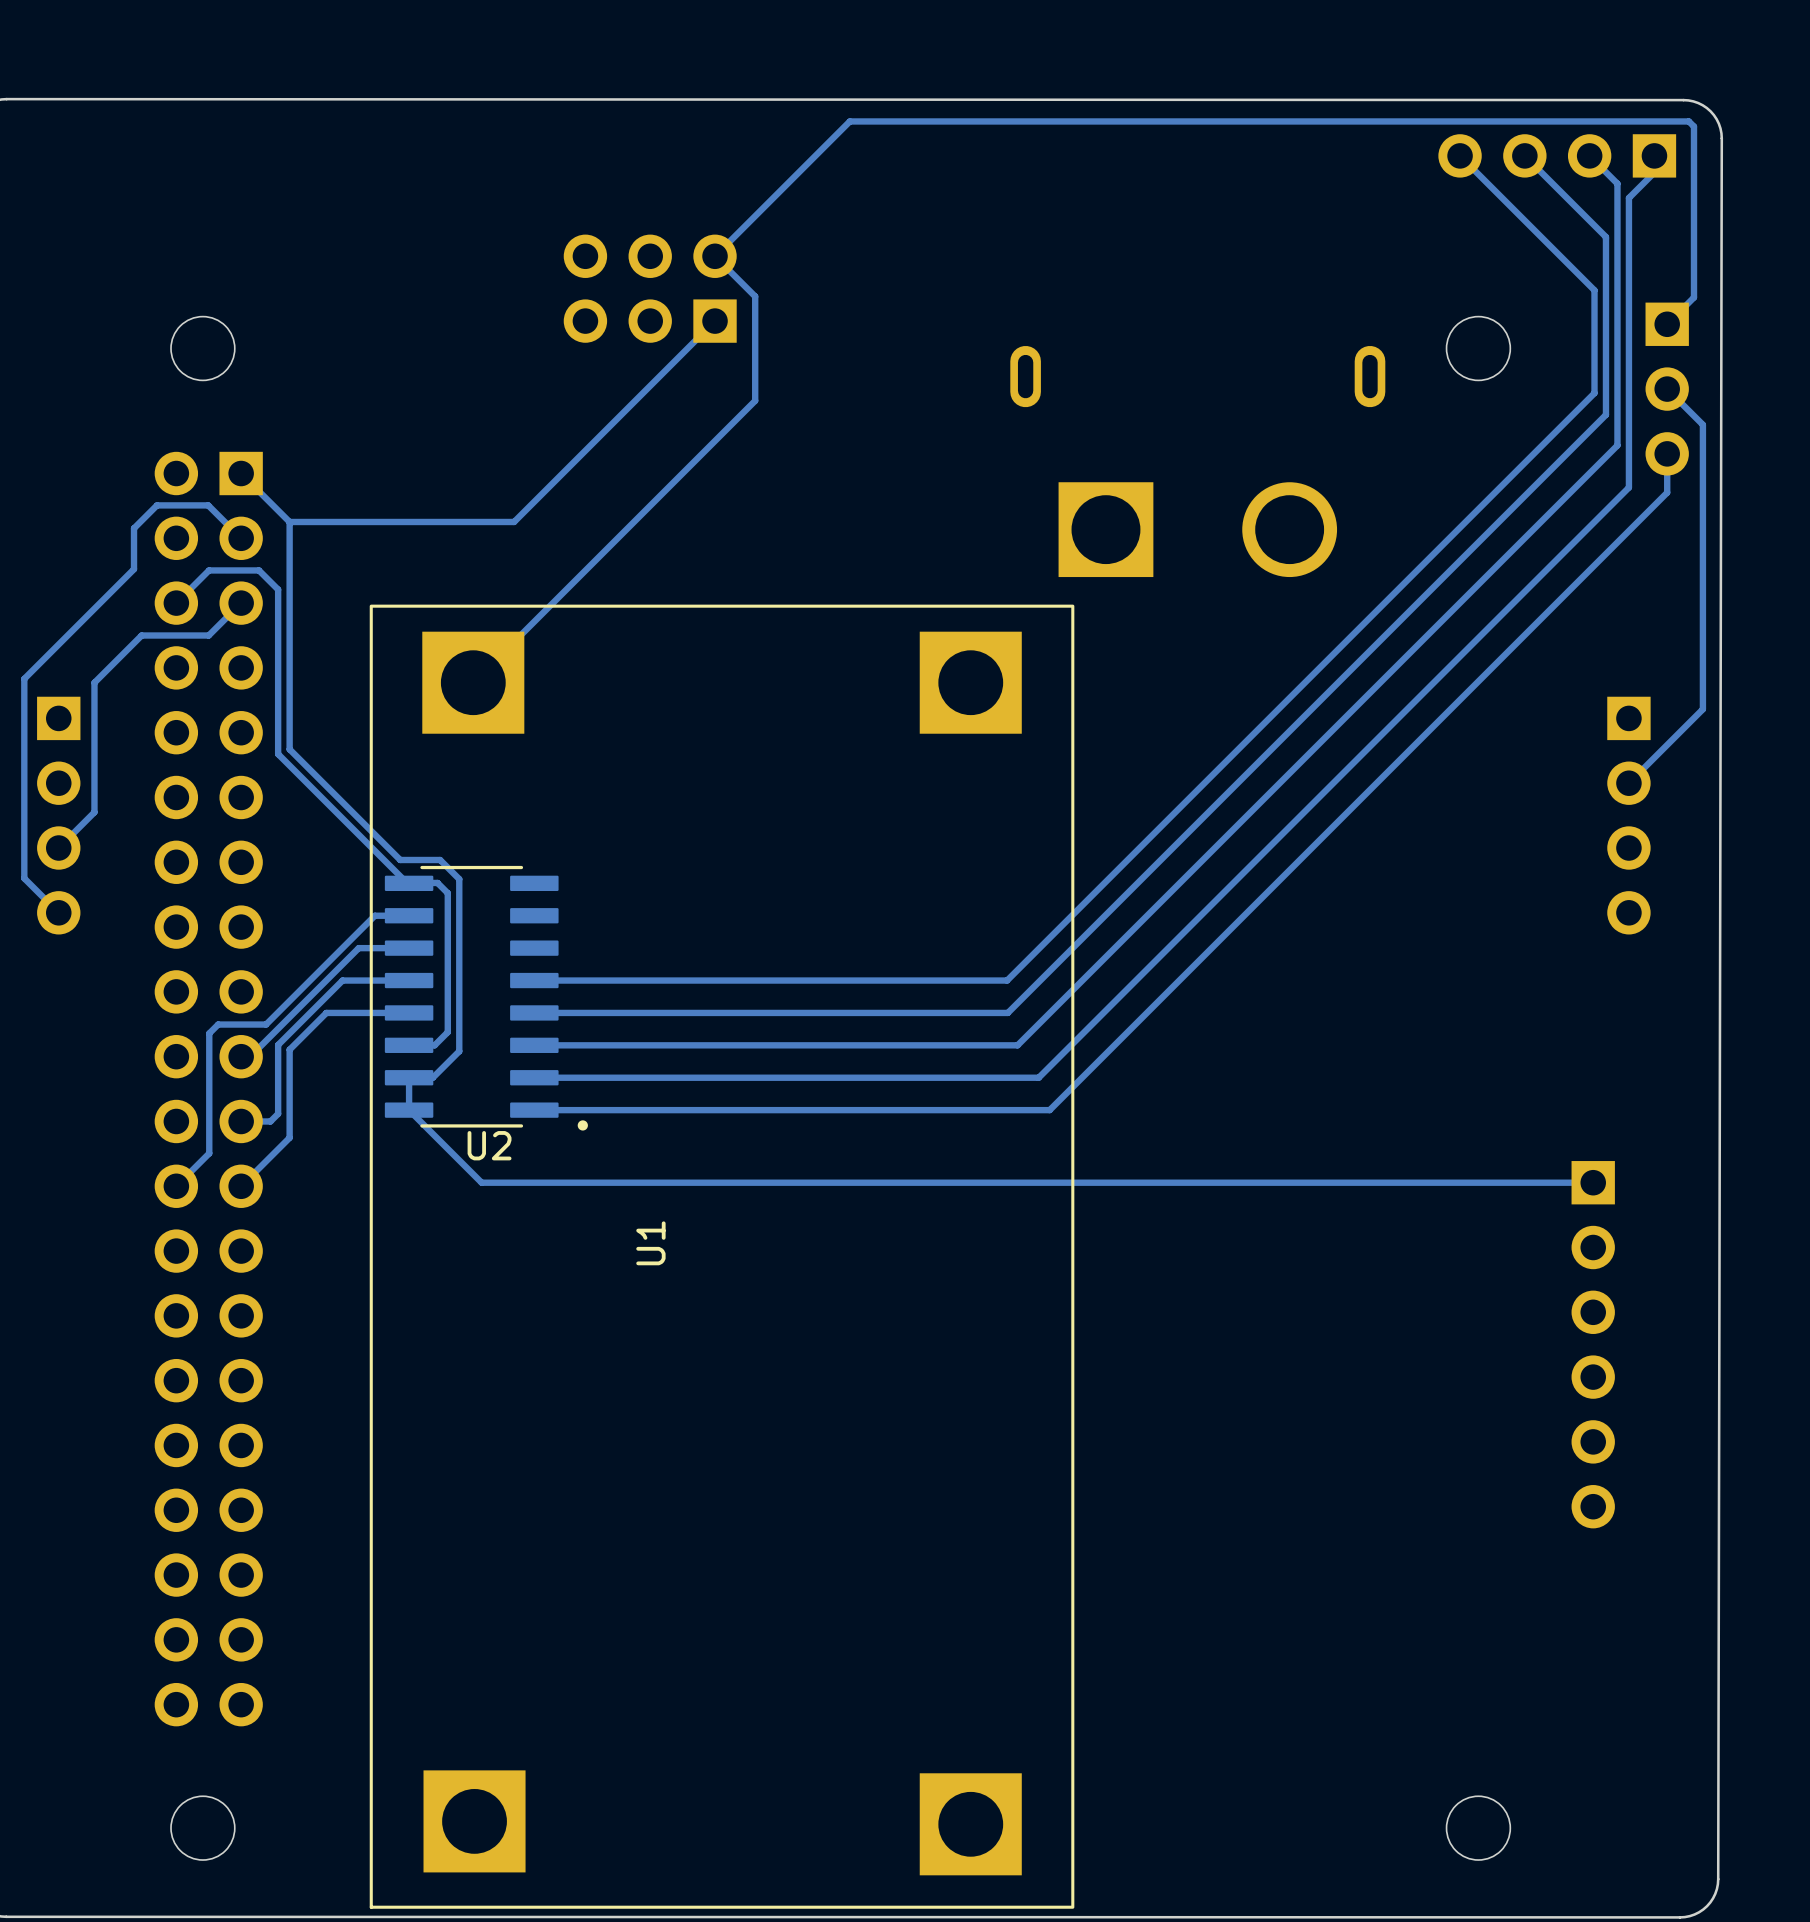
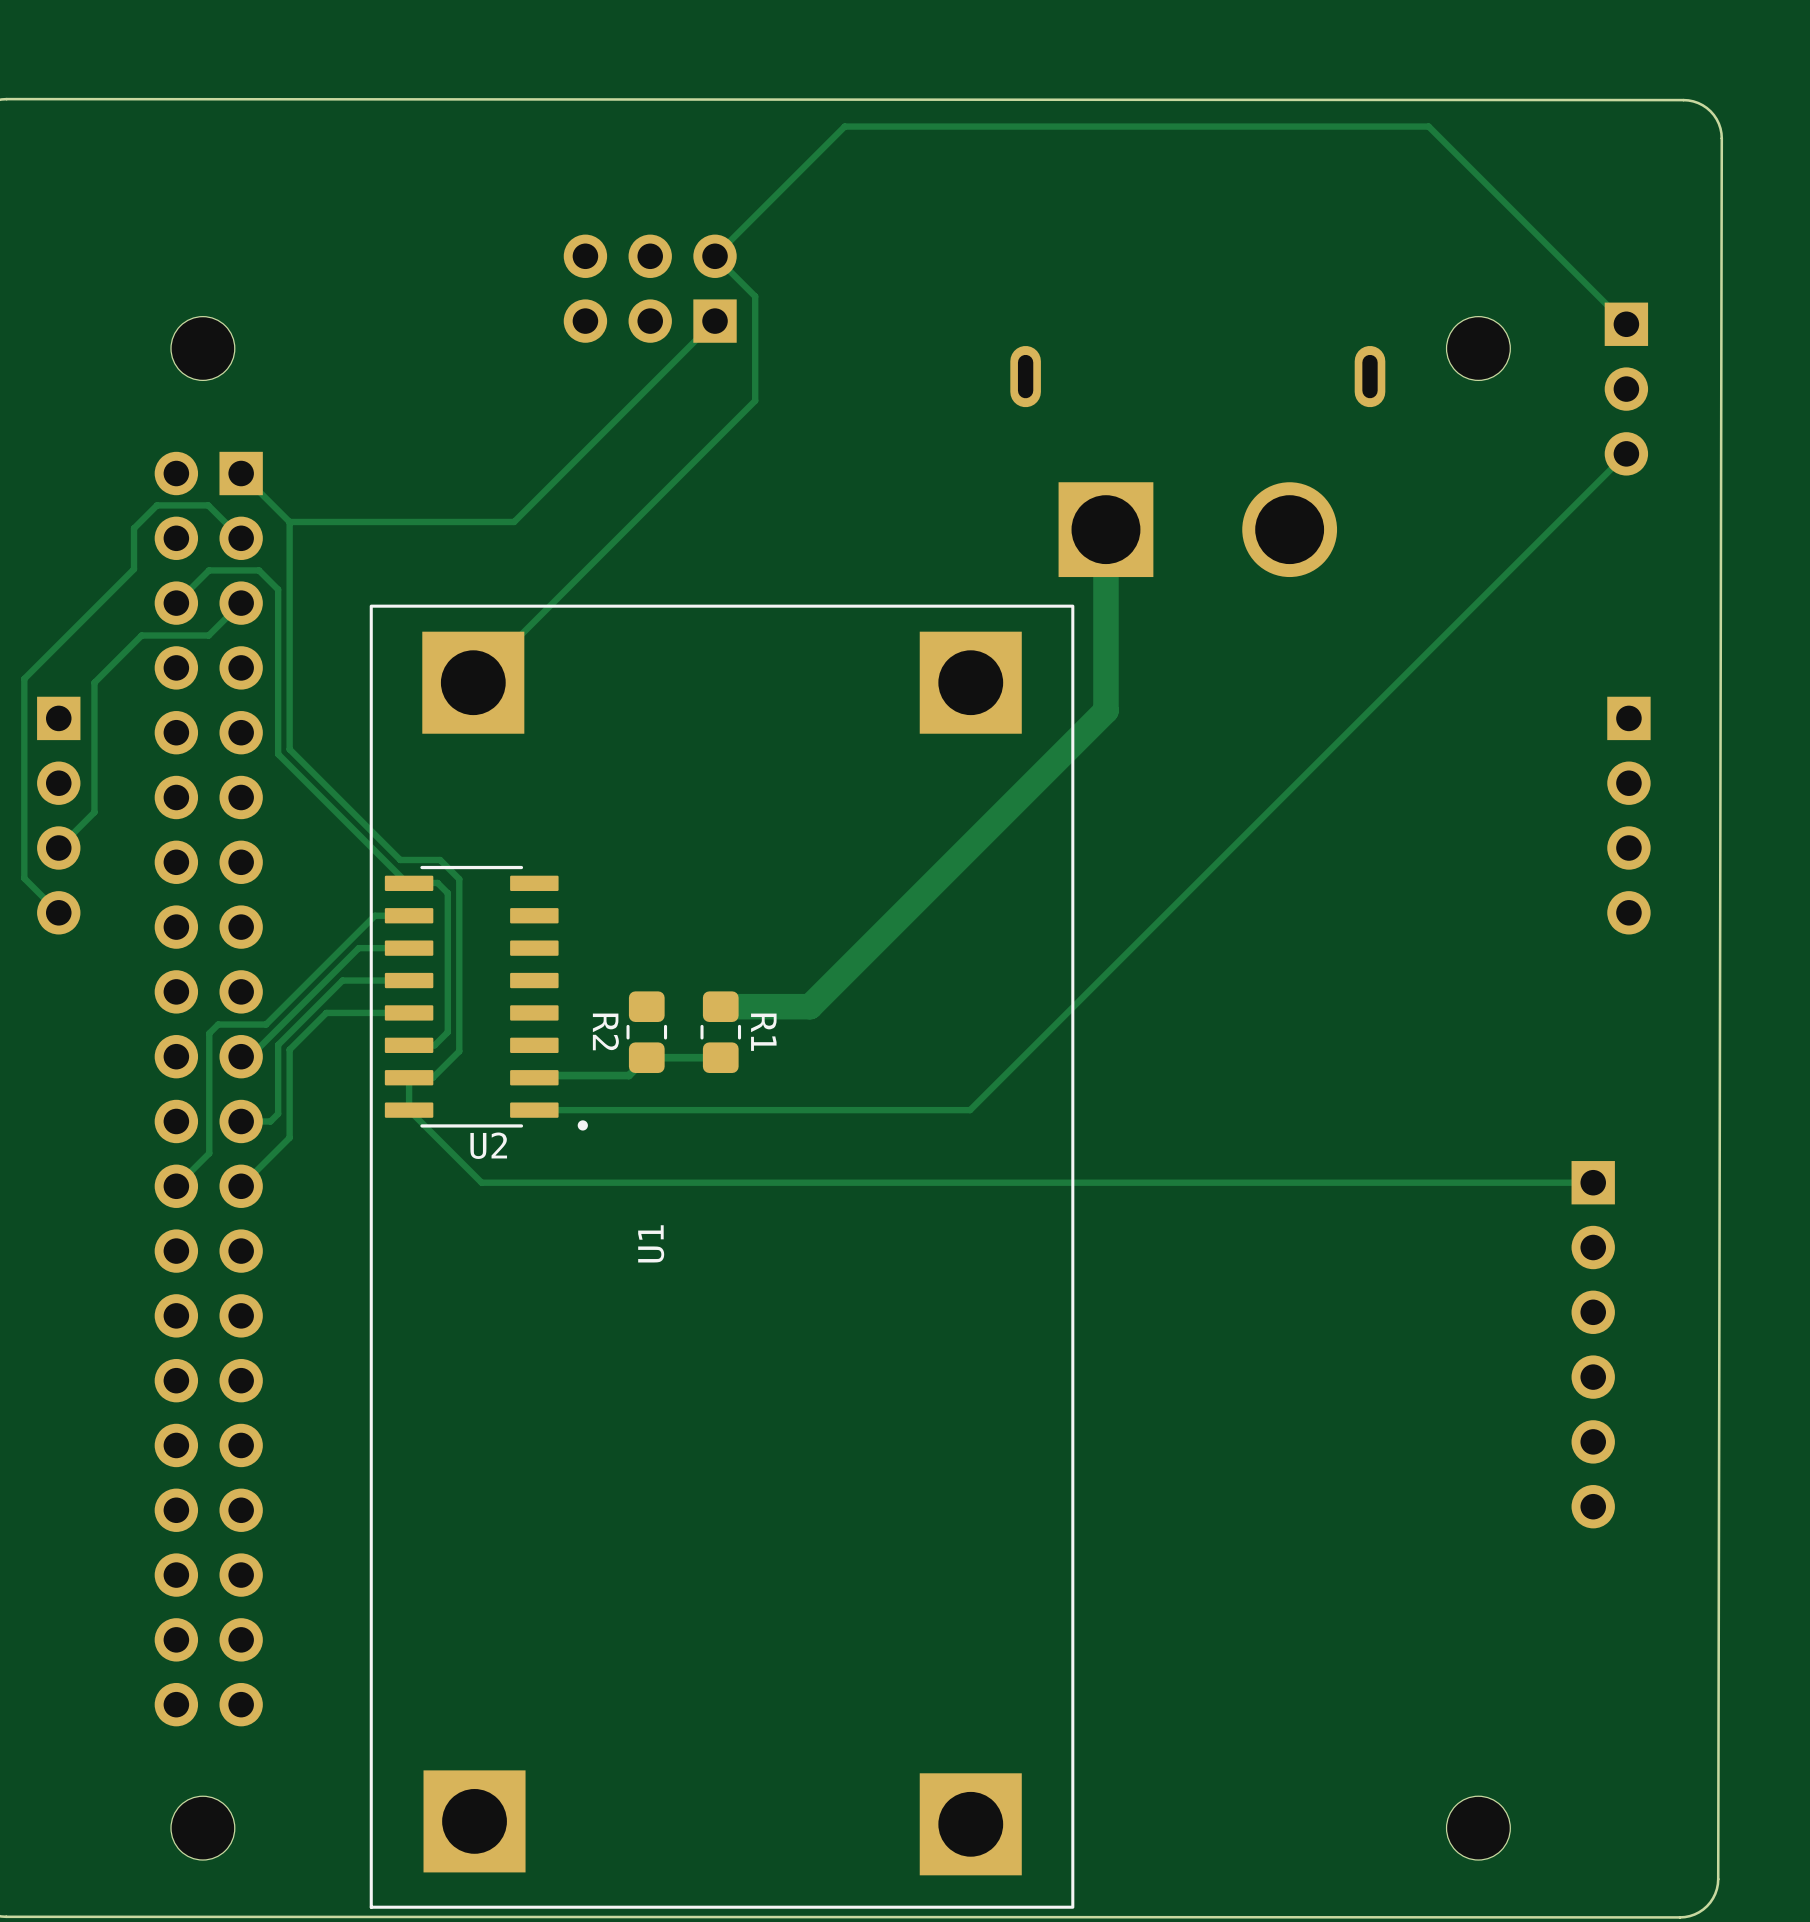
track: (844, 126) (849, 121) (1688, 121) (1693, 126) (1693, 297) (1667, 324) -> (844, 126) (1428, 126) (1626, 324)
track: (1460, 155) (1594, 290) (1594, 393) (1007, 980) (534, 980) -> none
track: (1524, 155) (1605, 237) (1605, 414) (1007, 1012) (534, 1012) -> none
part: (1557, 155) -> none
track: (1589, 155) (1617, 183) (1617, 445) (1017, 1045) (534, 1045) -> none
track: (1654, 155) (1654, 172) (1628, 197) (1628, 487) (1038, 1077) (534, 1077) -> (720, 1057) (646, 1057) (628, 1075) (536, 1075) (534, 1077)
track: (1667, 389) (1702, 424) (1702, 709) (1628, 783) -> none
part position: (1667, 389) -> (1626, 389)
track: (1667, 453) (1667, 492) (1049, 1110) (970, 1110) -> (1626, 453) (970, 1110)
track: none -> (1105, 529) (1105, 710) (810, 1006) (720, 1006)
R2: none -> (646, 1032)
R1: none -> (720, 1032)

